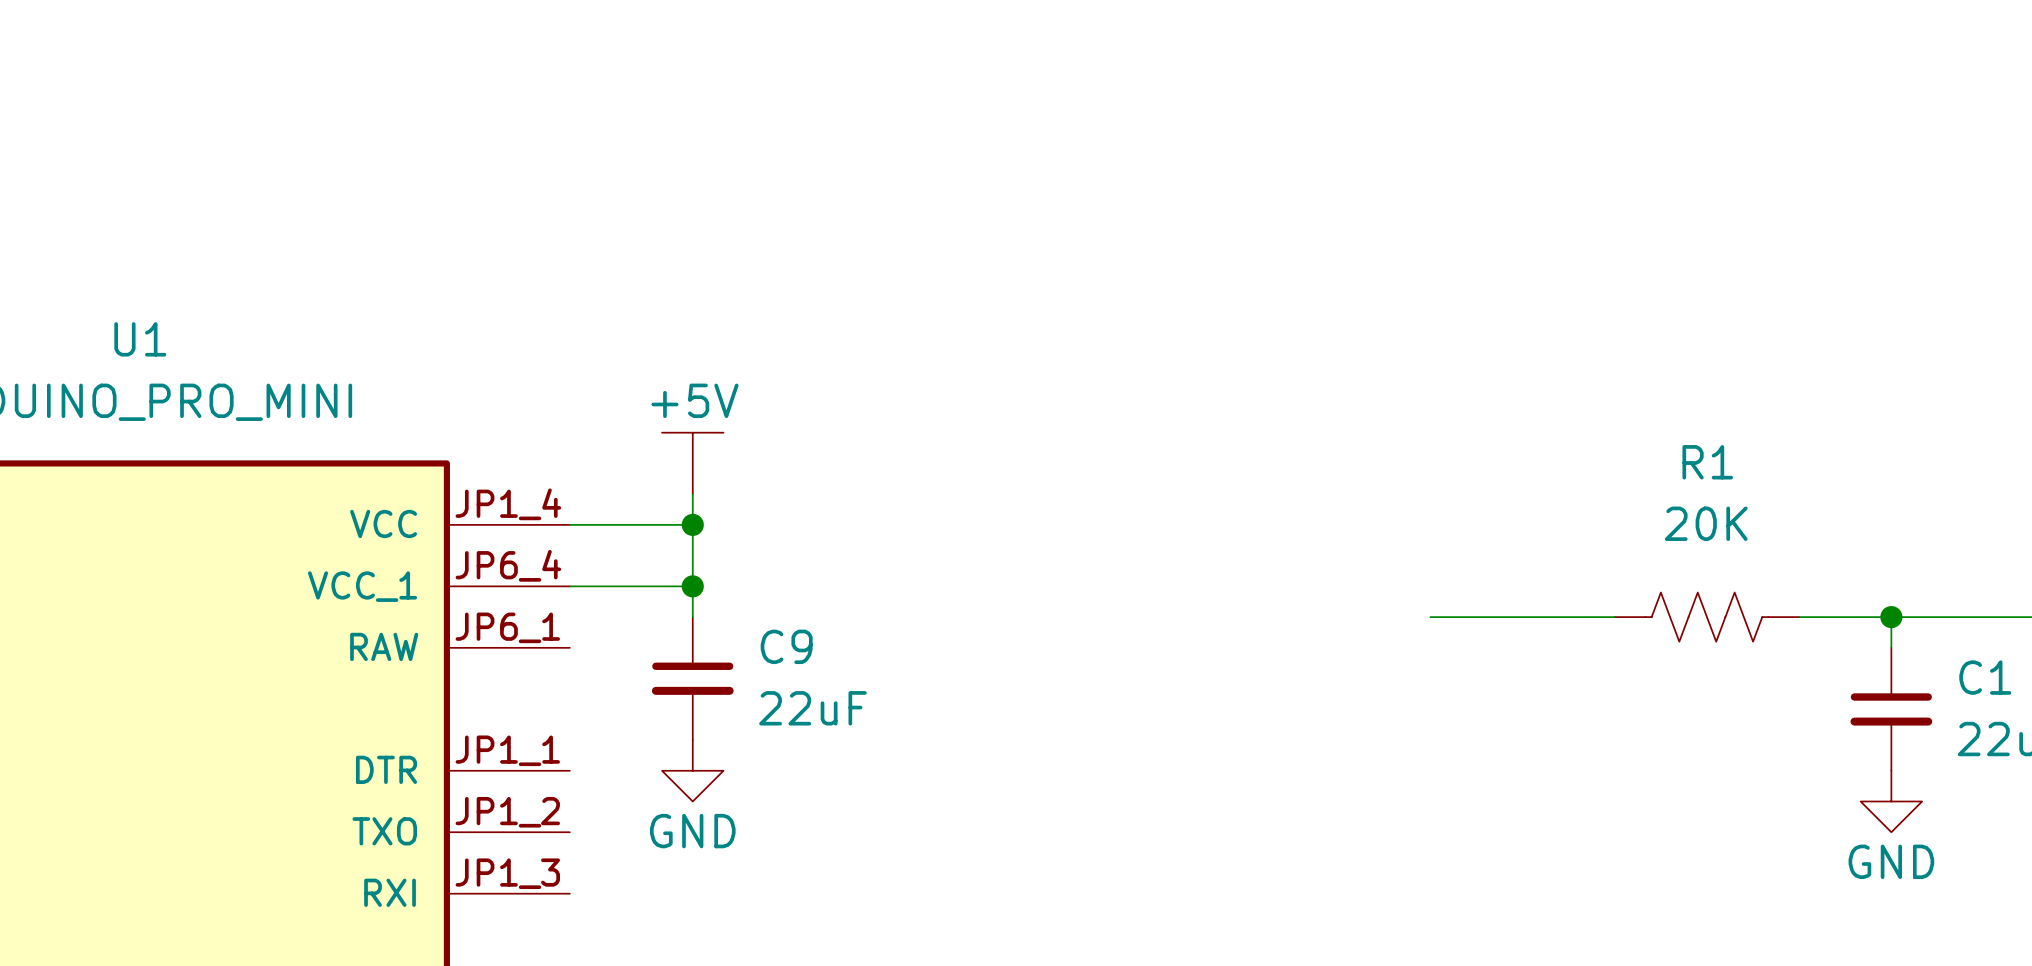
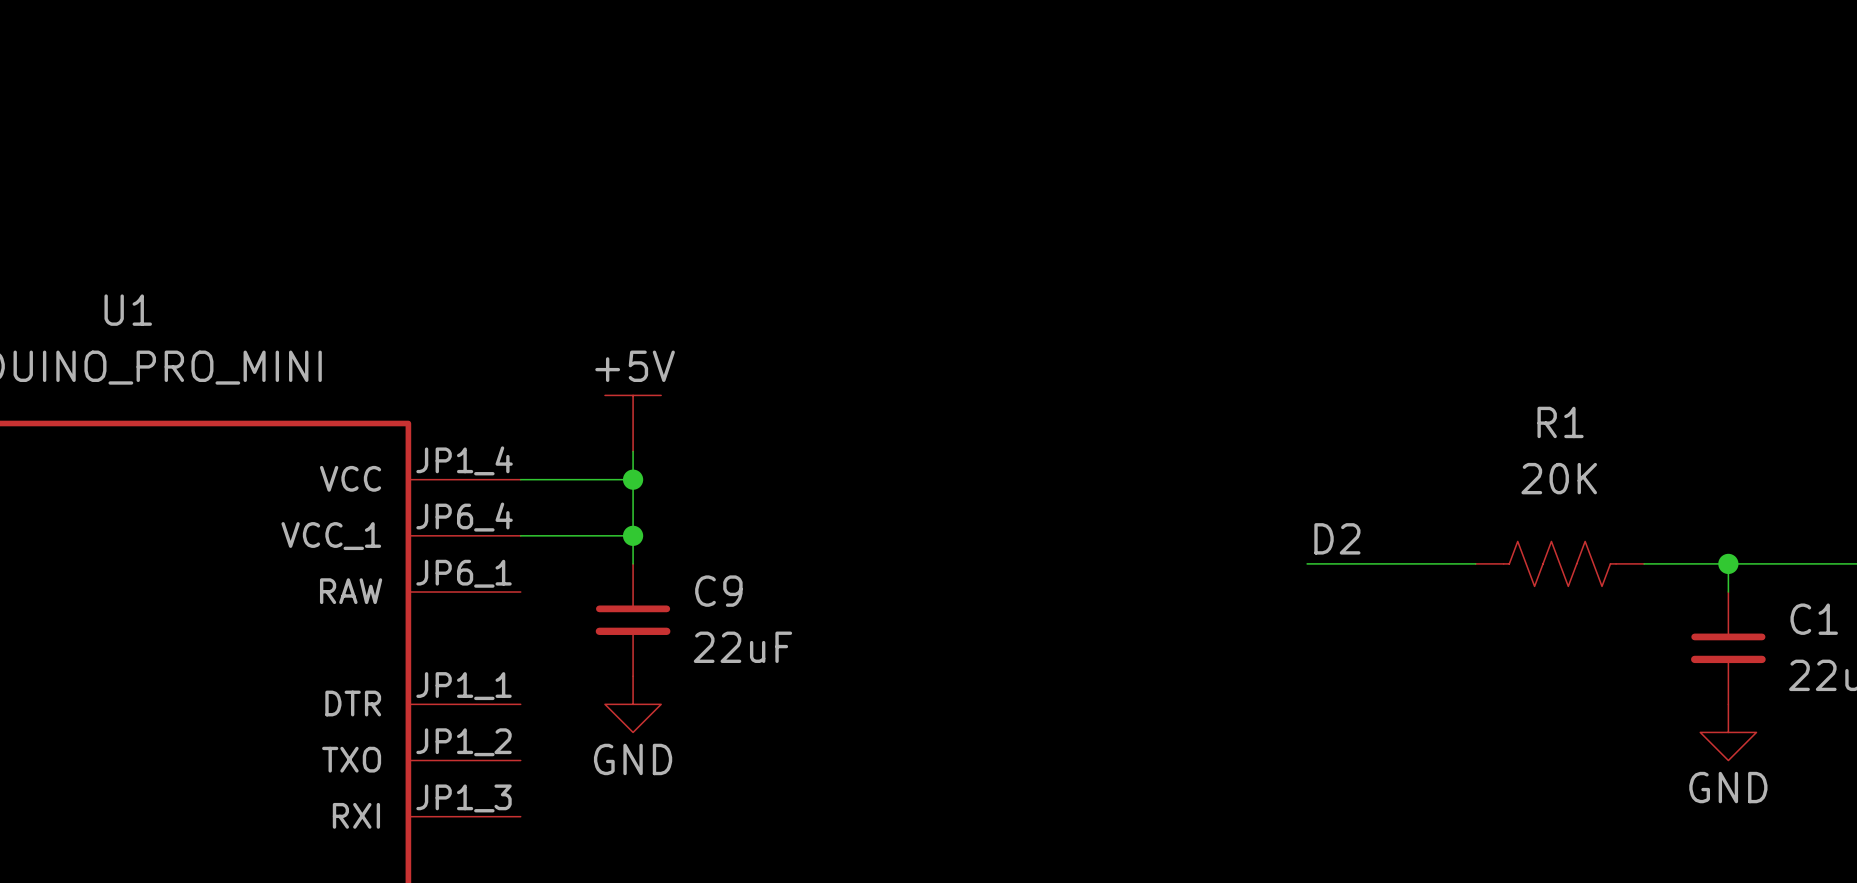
label: none -> D2 (1337, 538)

